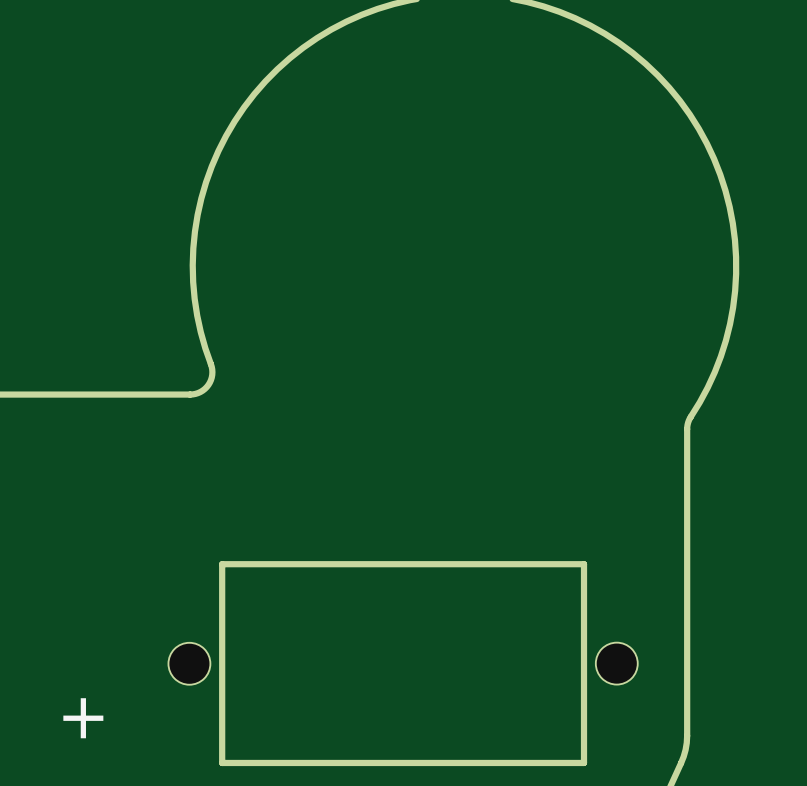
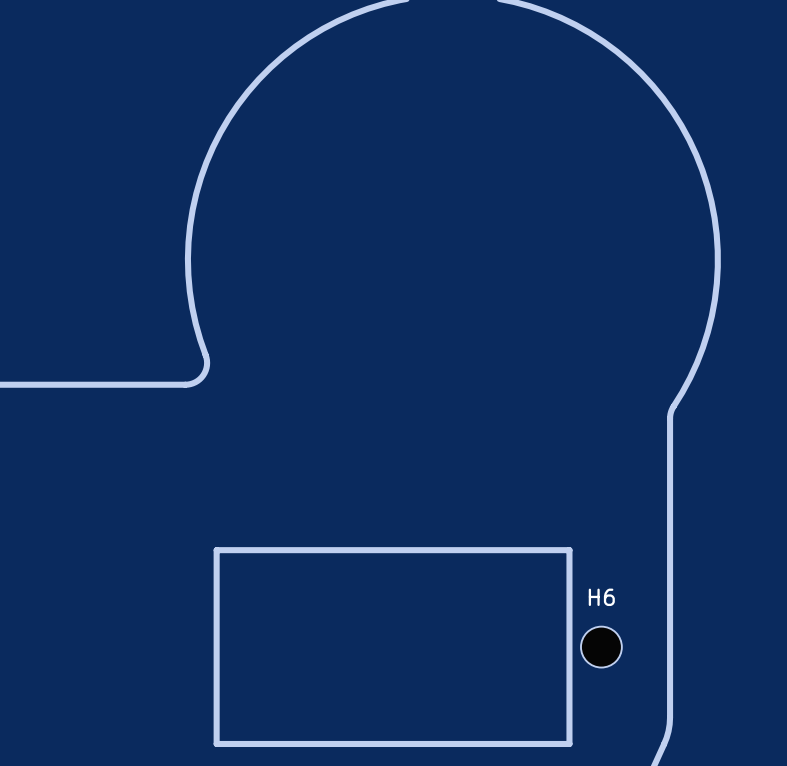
H6 name: none -> H6 (601, 597)
part: (189, 663) -> none
text: + (83, 718) -> none

